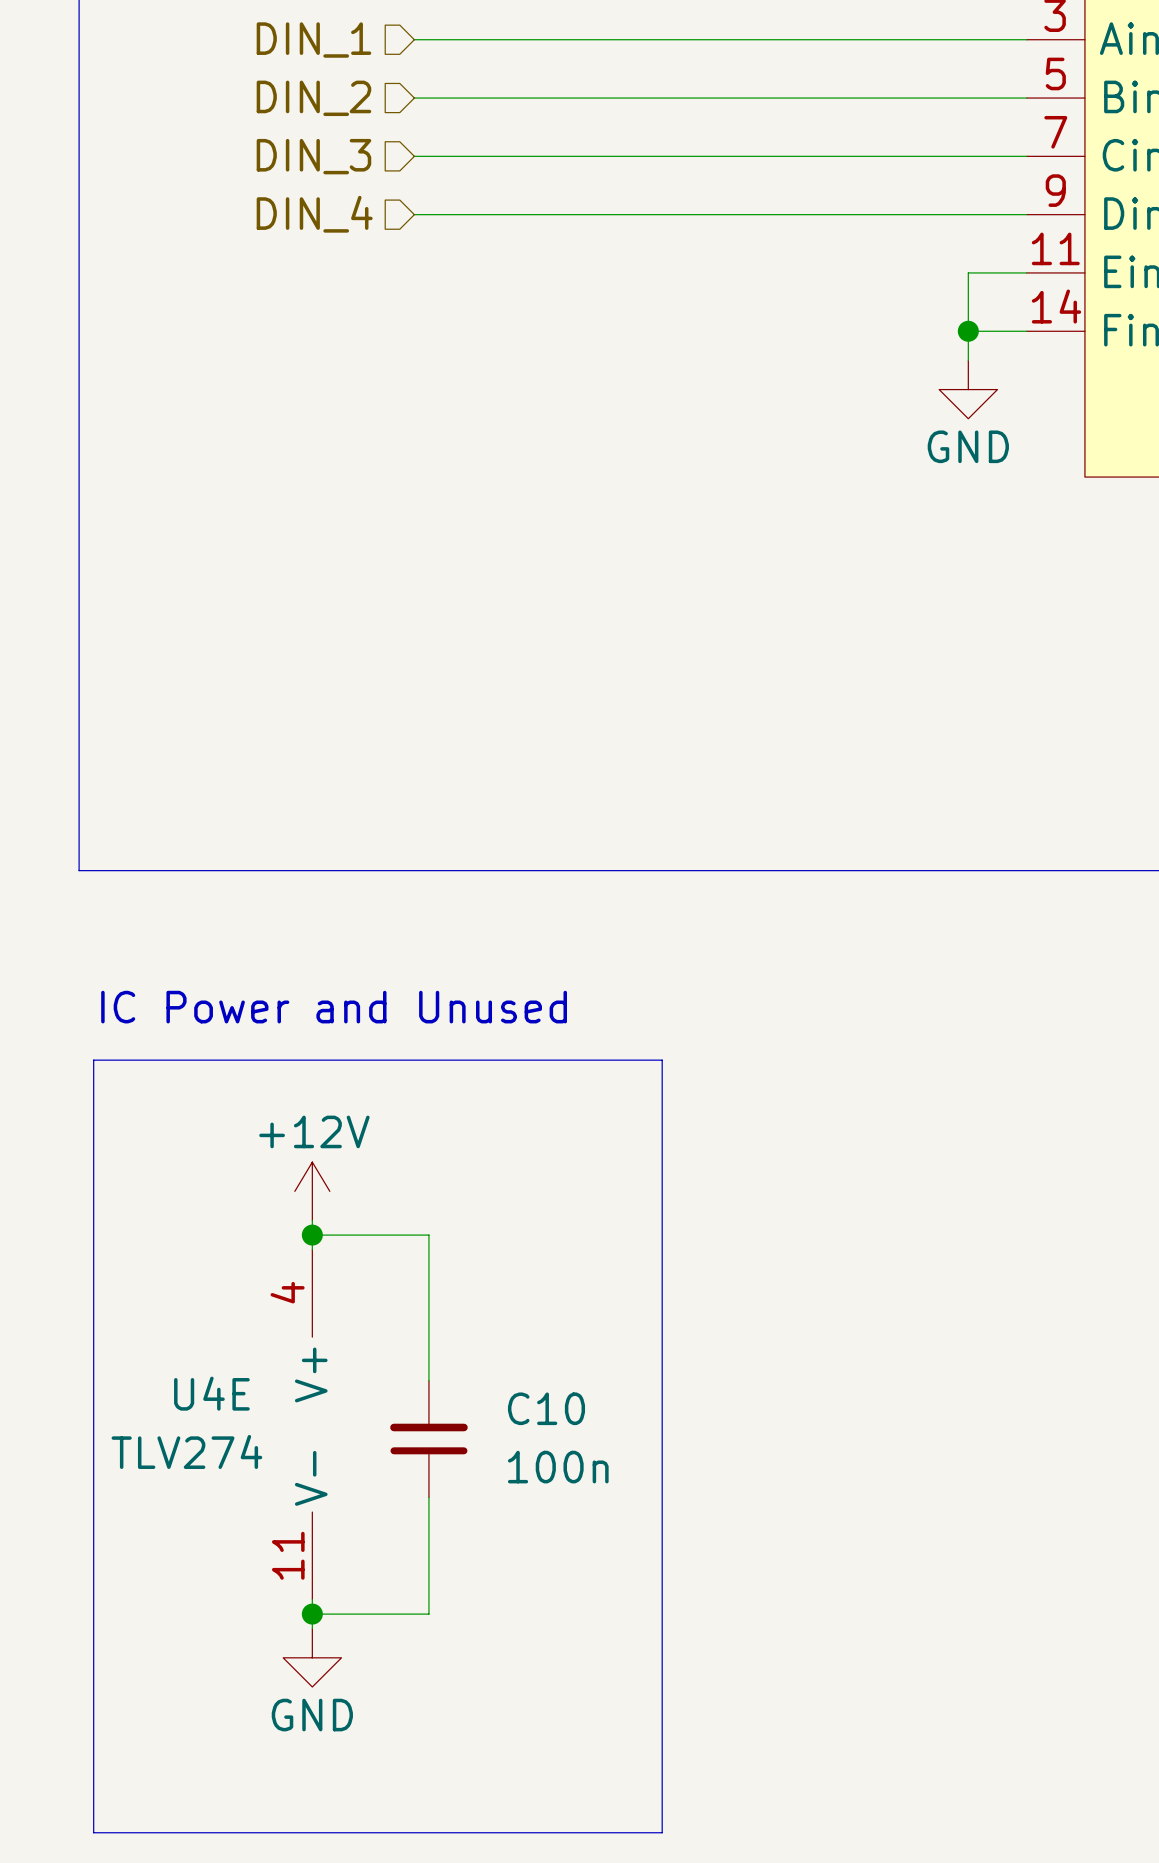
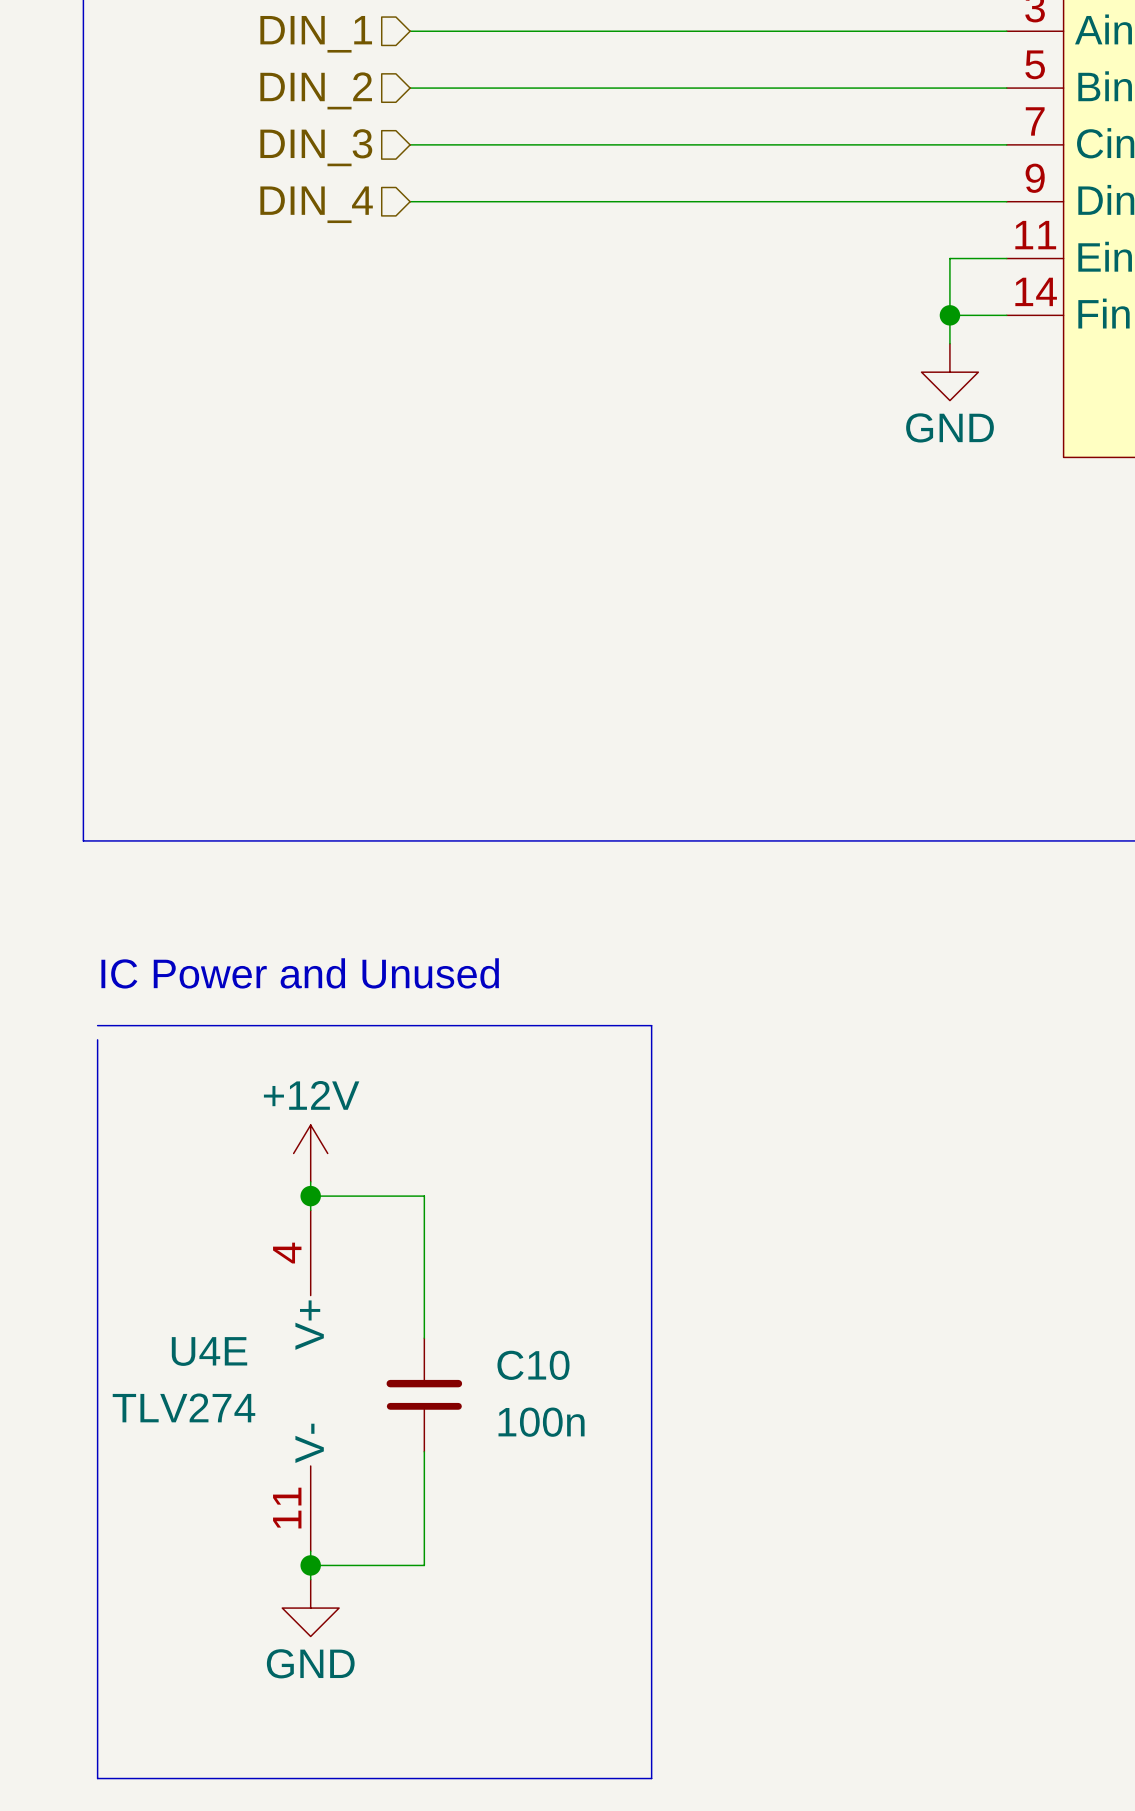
line: (93, 1060) (93, 1074) -> none

